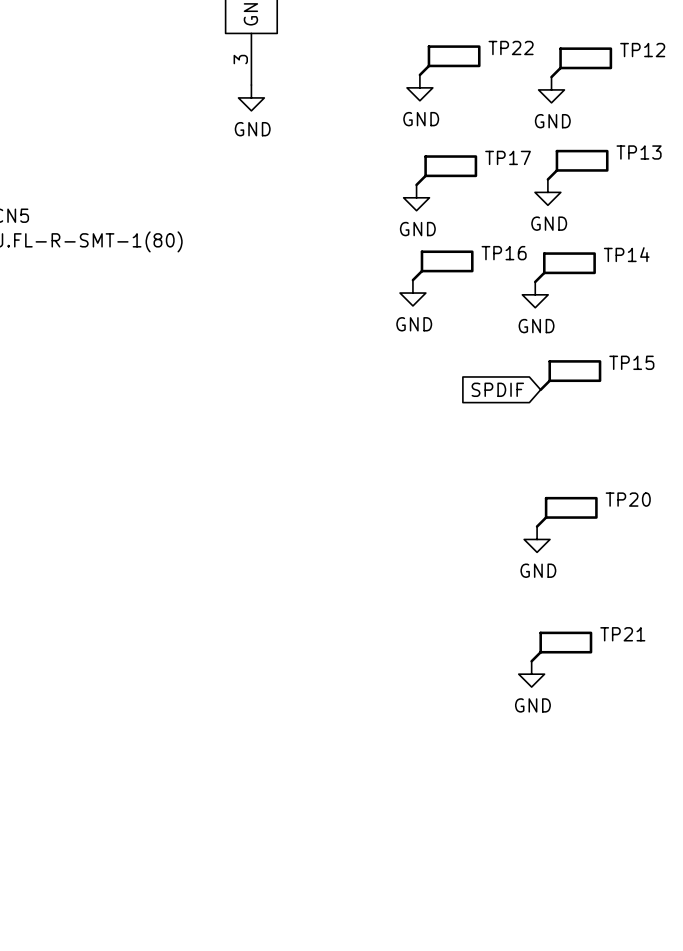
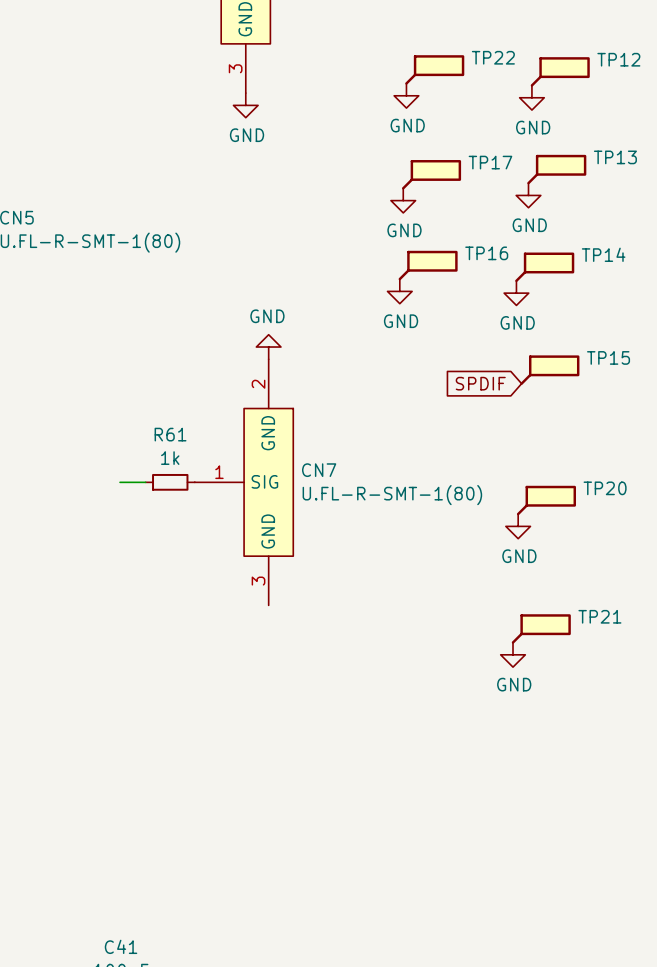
power symbol: none -> GND (268, 347)
wire: none -> (120, 482) (145, 482)
R61: none -> 1k (170, 482)
CN7: none -> U.FL-R-SMT-1(80) (244, 482)

